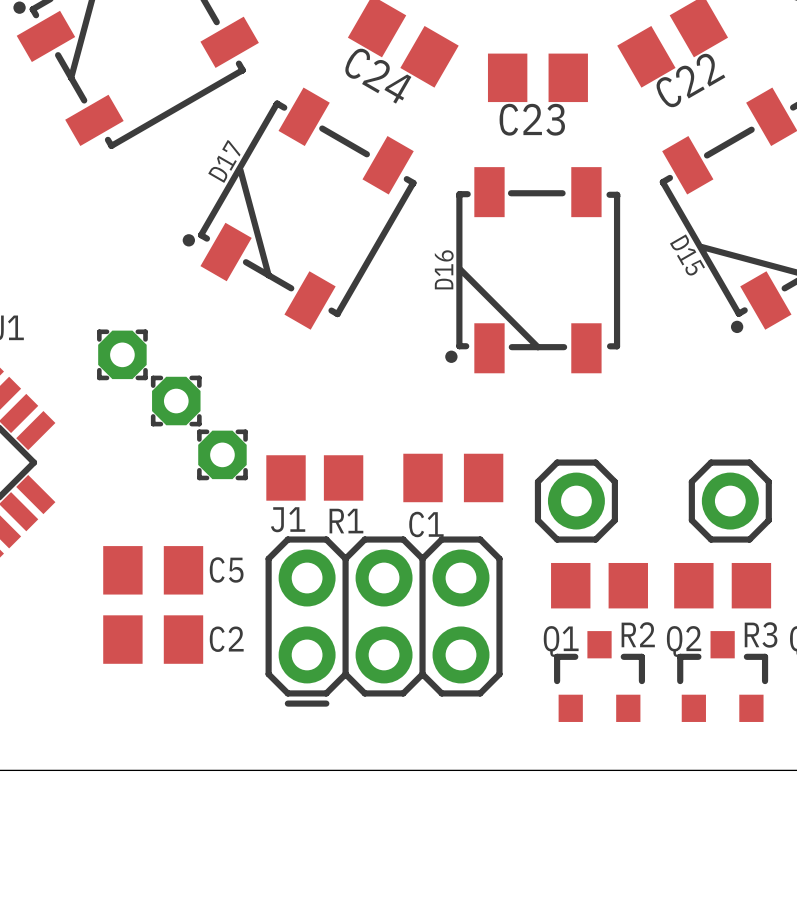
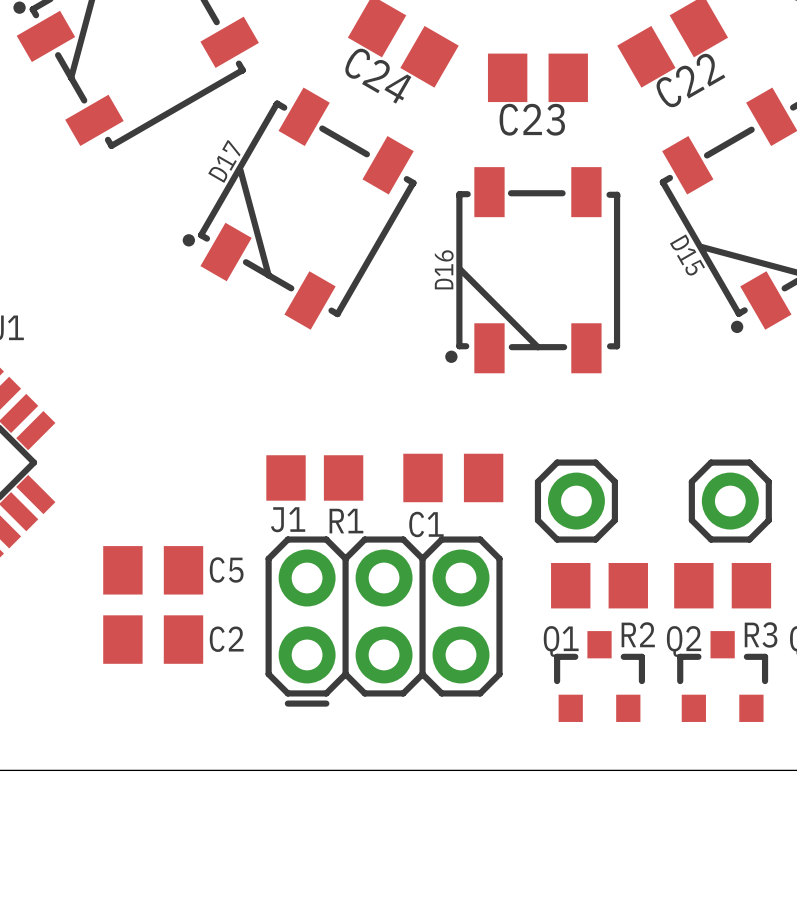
part: (122, 354) -> none
part: (176, 401) -> none
part: (222, 454) -> none

